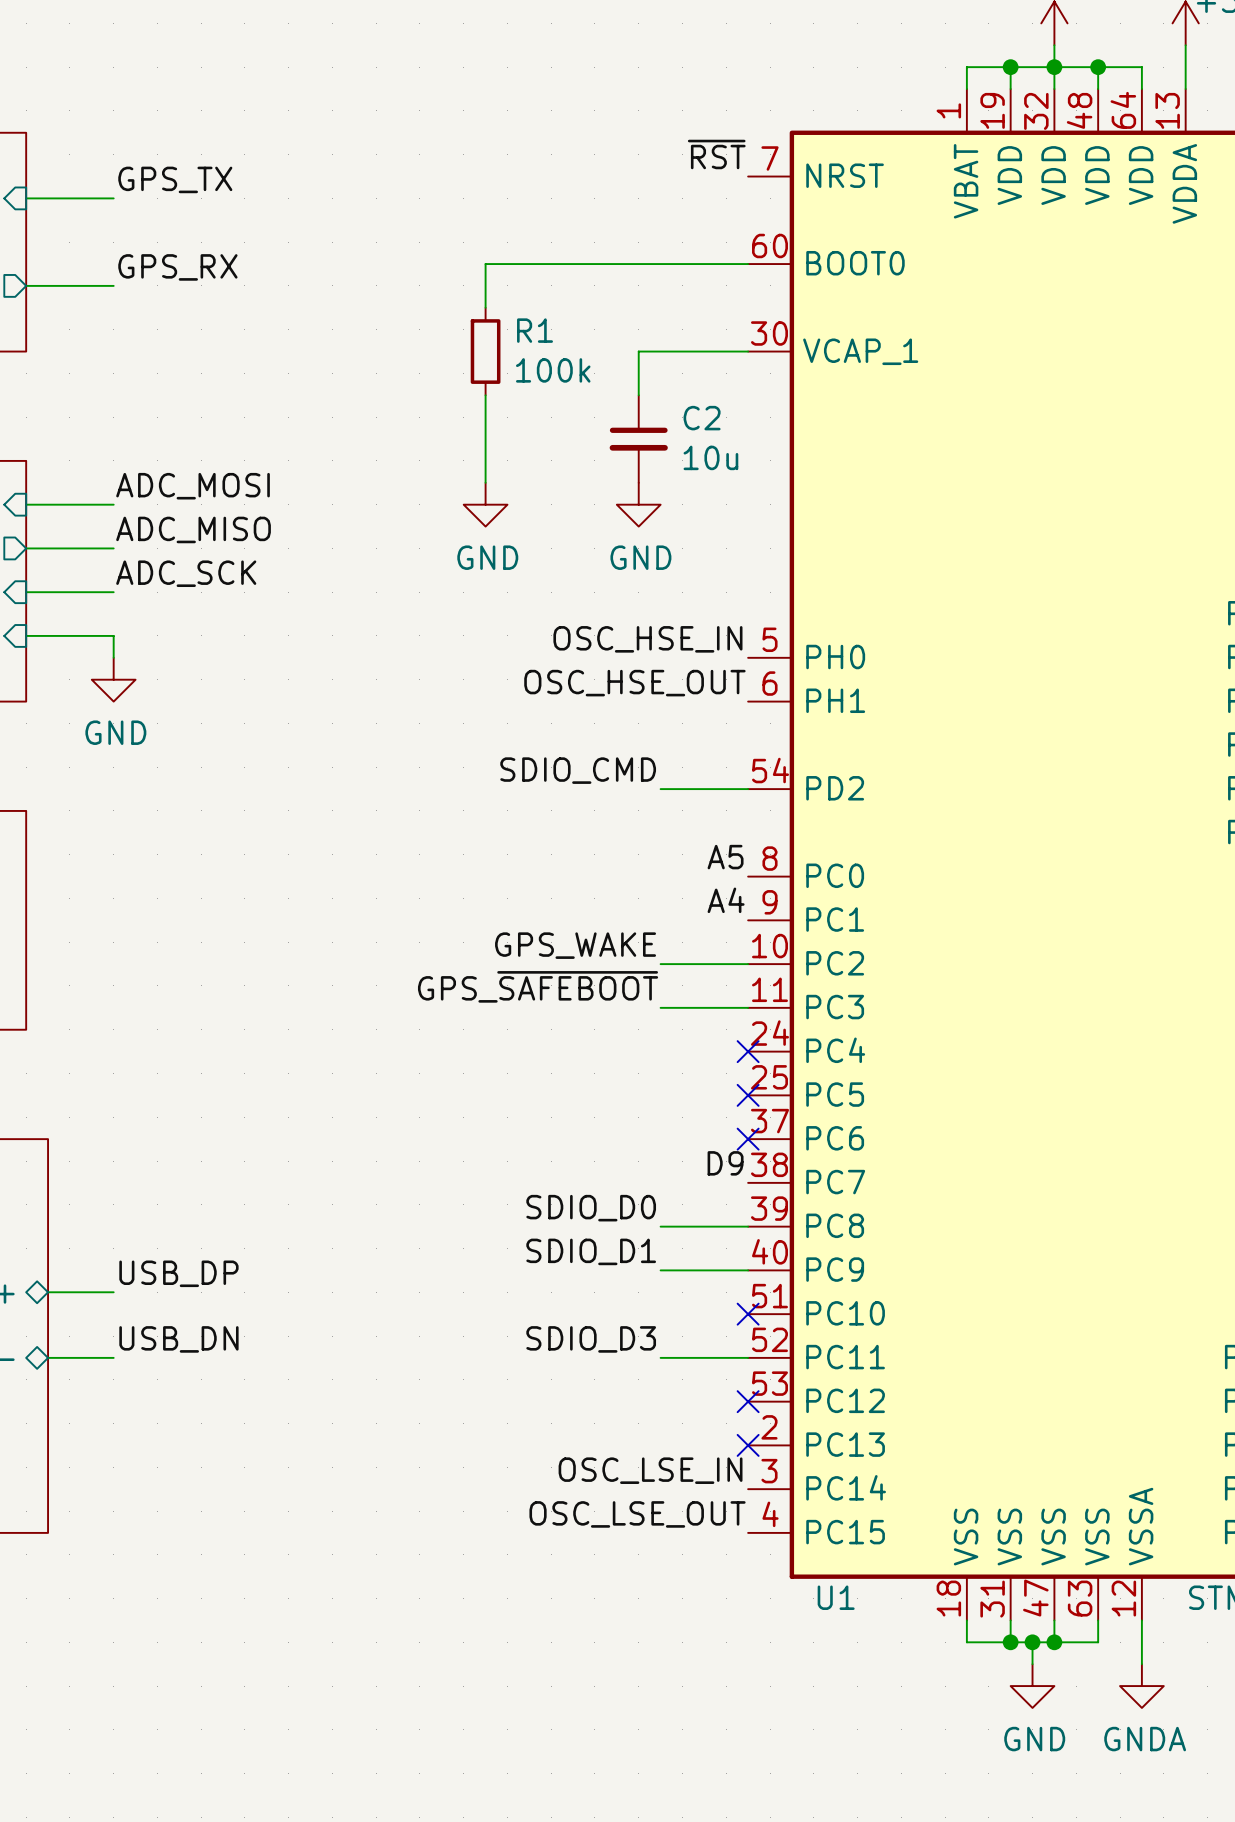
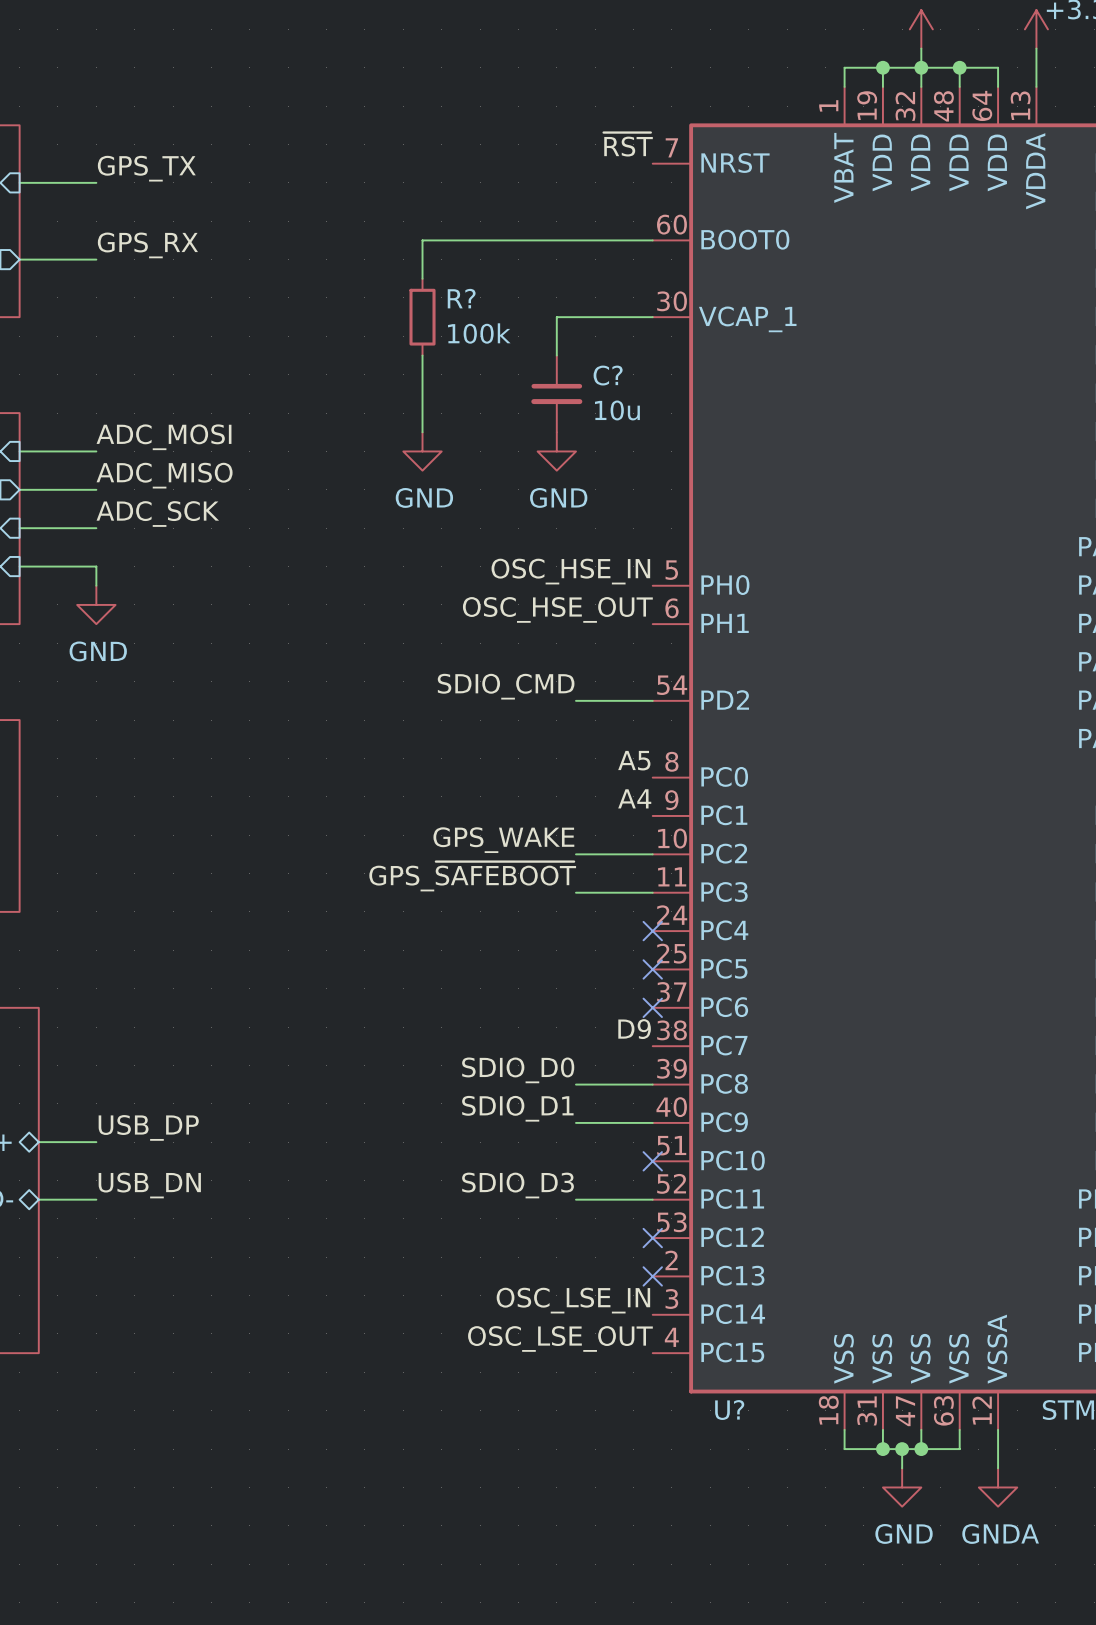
R1 name: R1 (535, 330) -> R? (461, 298)
C2 name: C2 (702, 418) -> C? (608, 375)
U1 name: U1 (836, 1597) -> U? (729, 1410)

